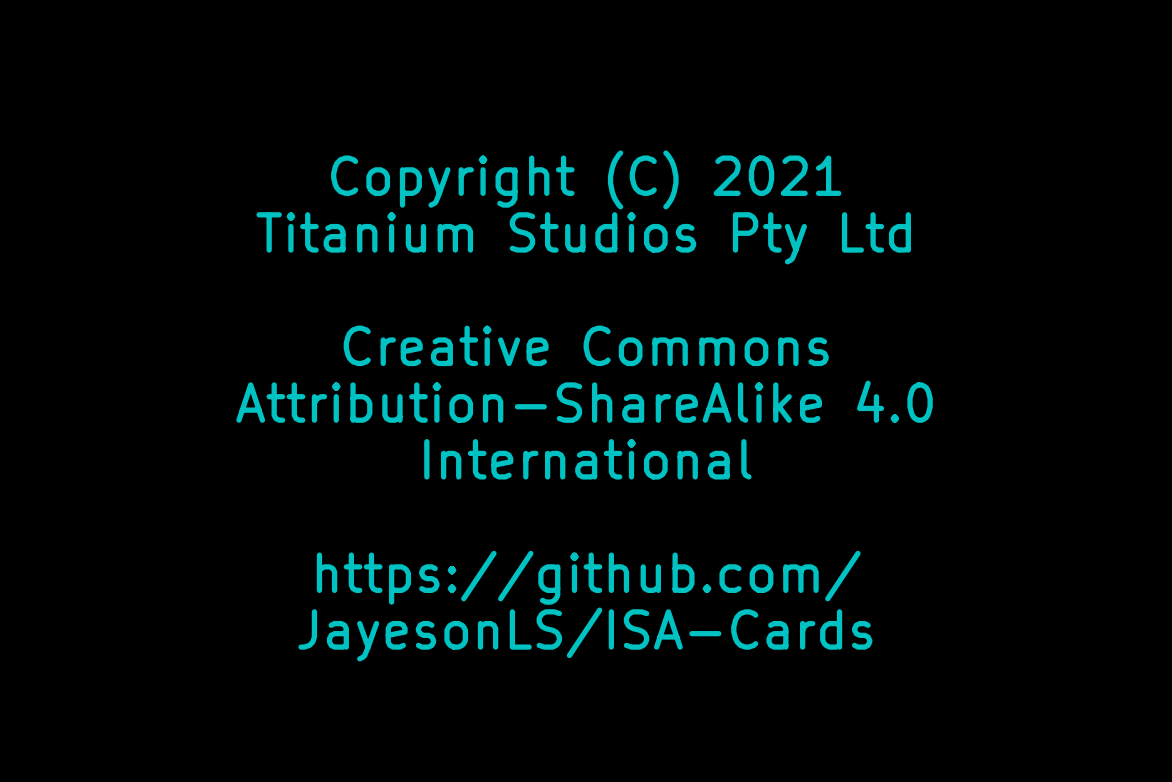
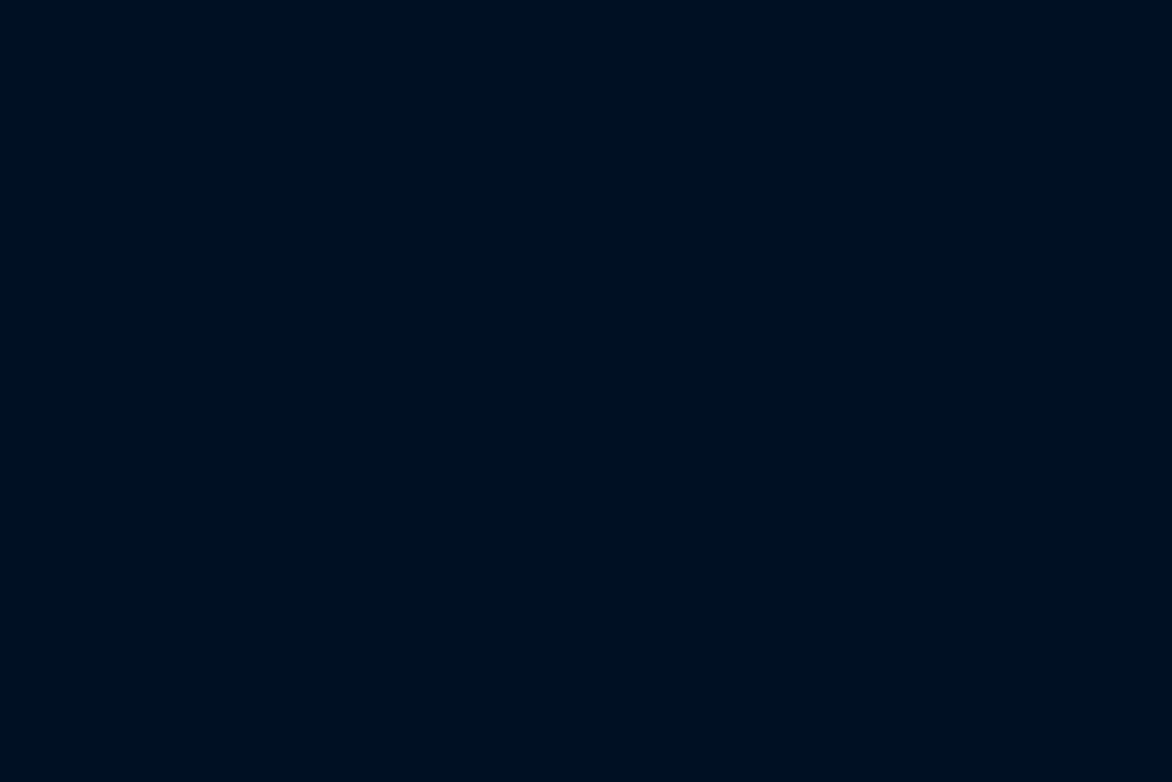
text: Copyright (C) 2021 (586, 179) -> none
text: Titanium Studios Pty Ltd (583, 238) -> none
text: Creative Commons (586, 345) -> none
text: Attribution-ShareAlike 4.0 (584, 401) -> none
text: International (587, 459) -> none
text: https://github.com/ (588, 577) -> none
text: JayesonLS/ISA-Cards (585, 634) -> none

